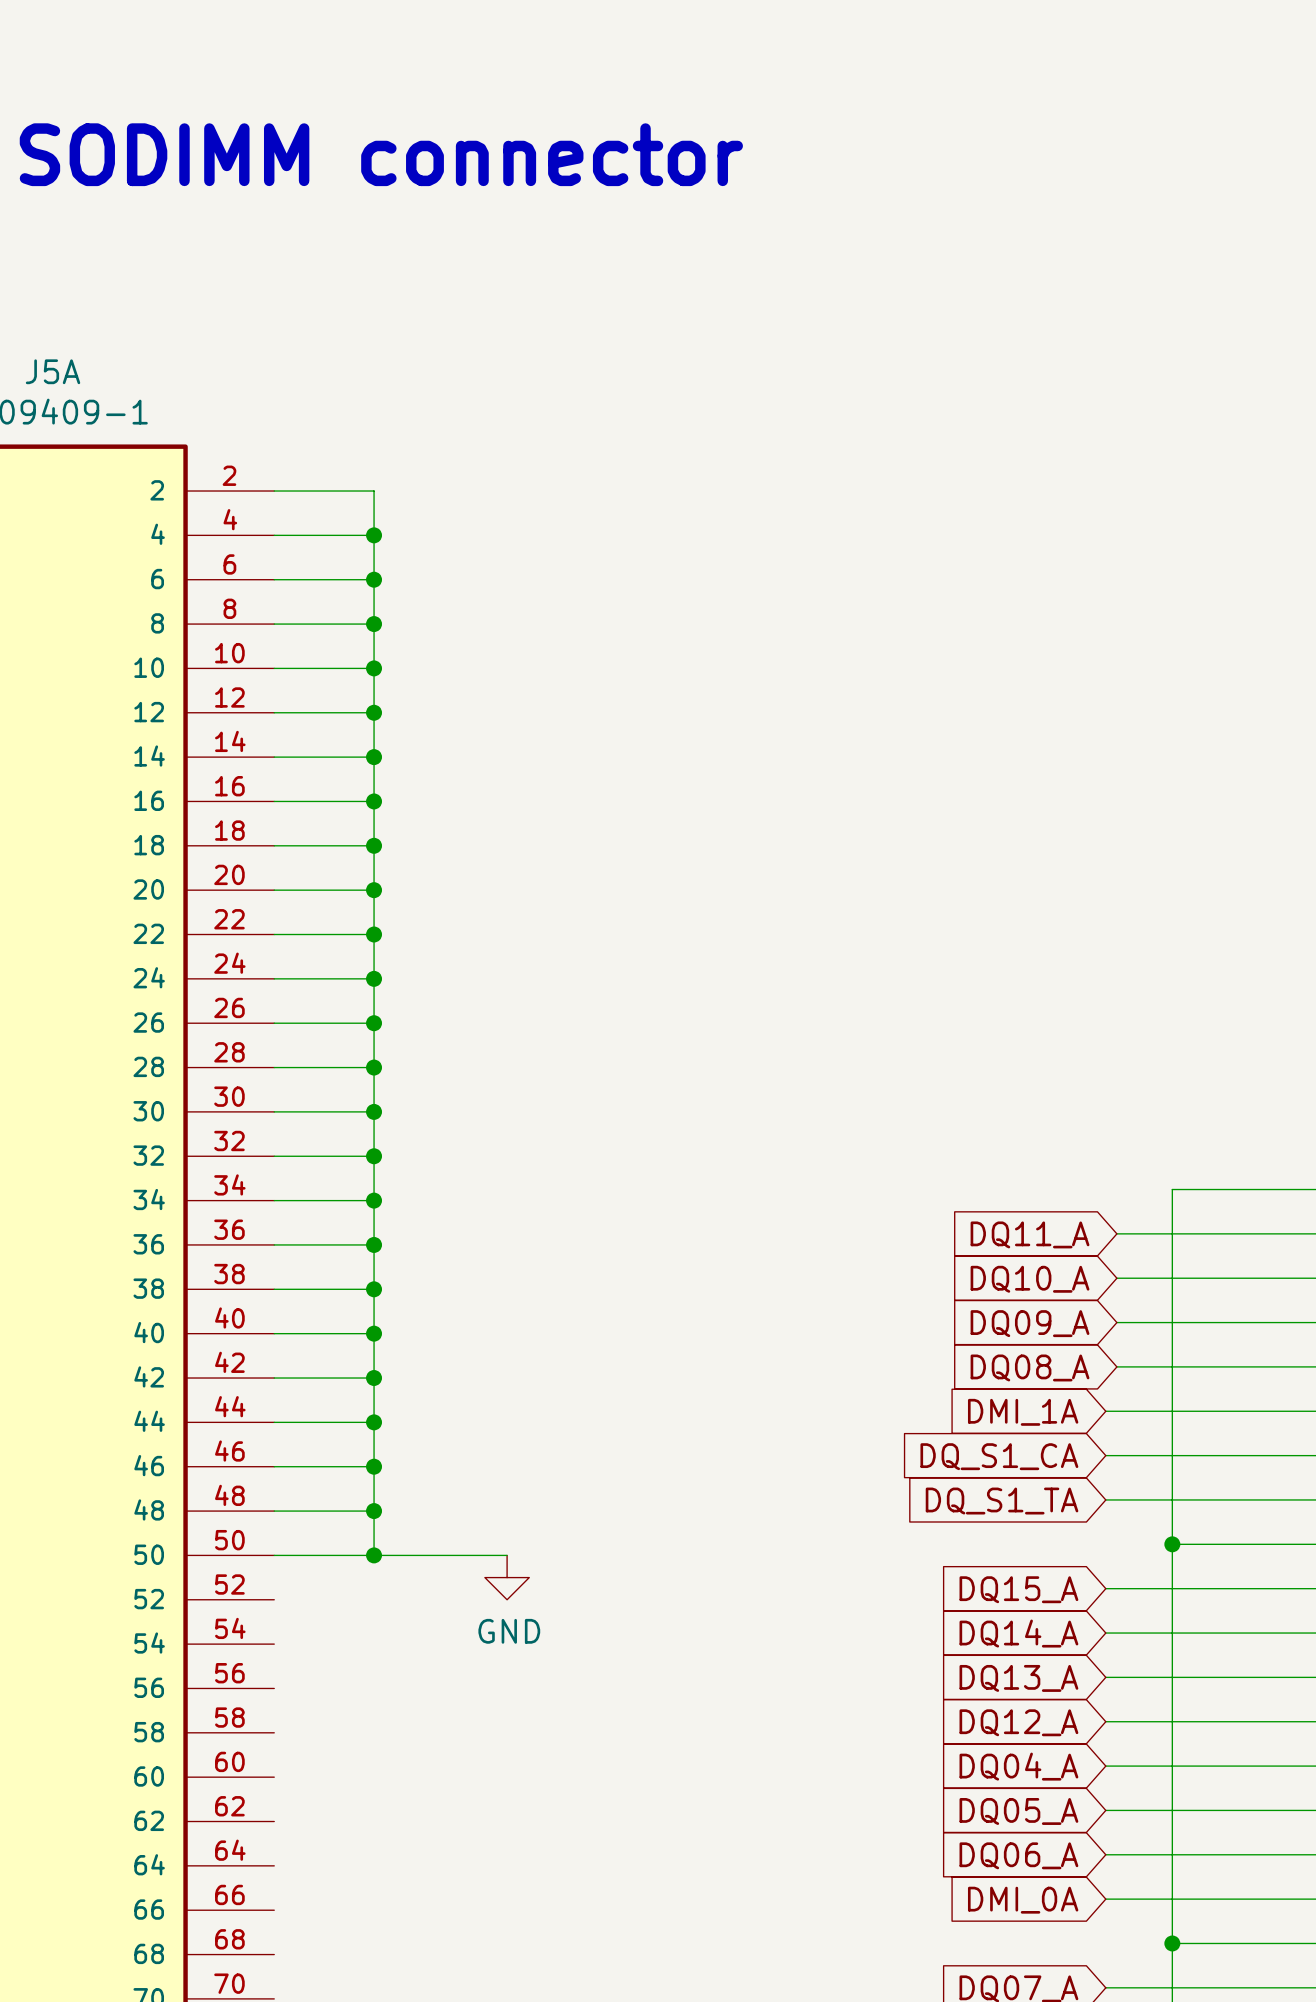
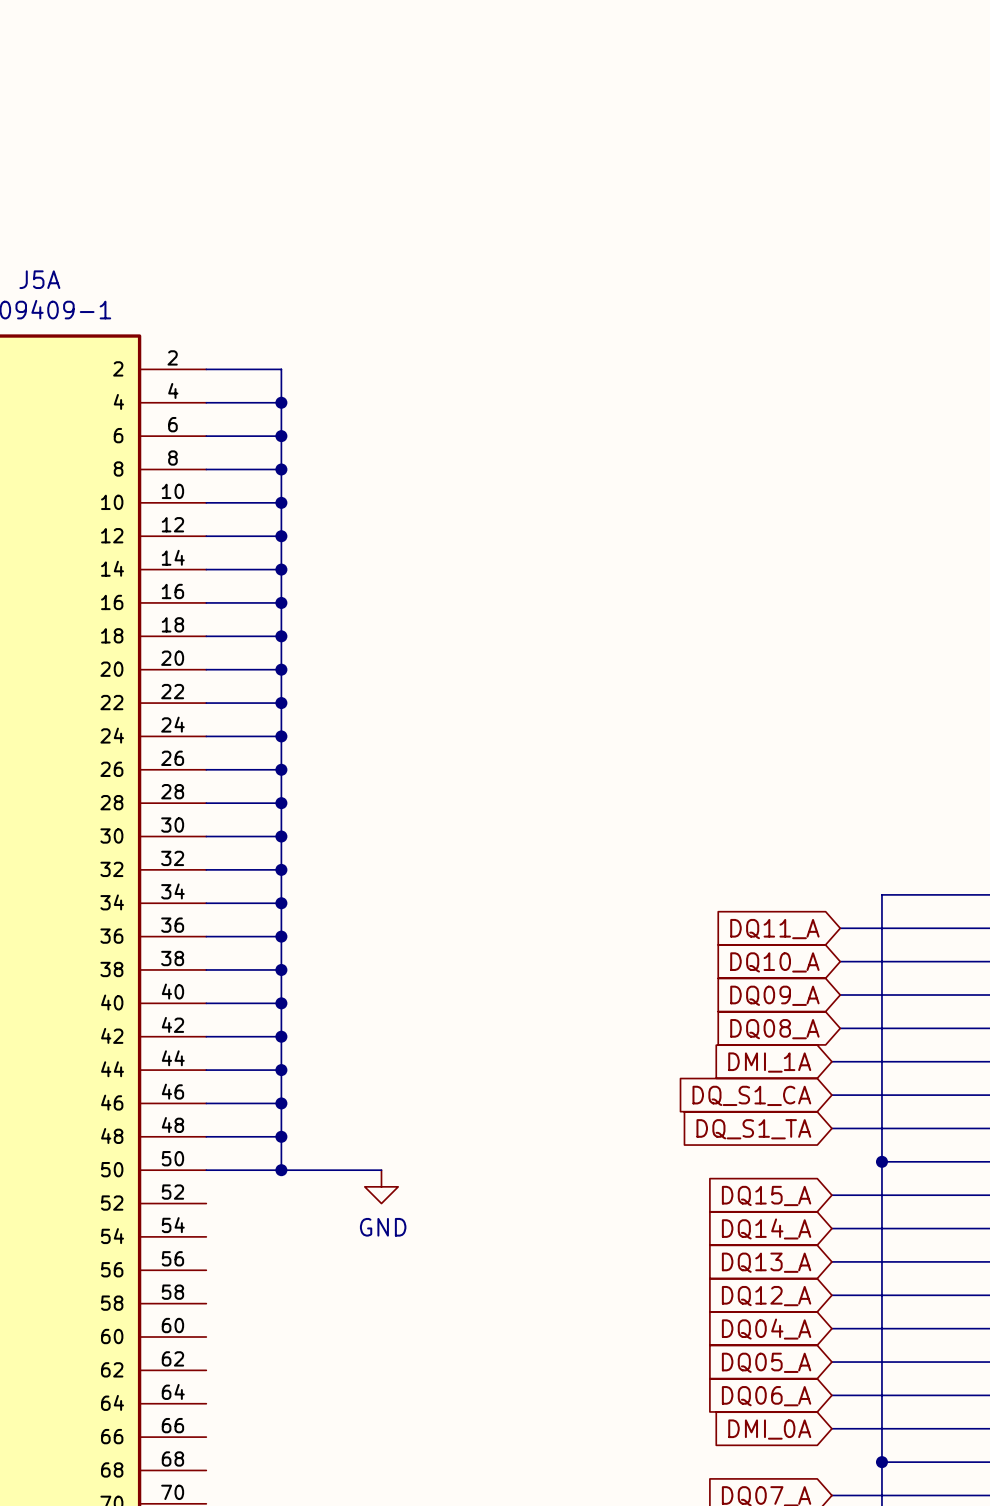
text: SODIMM connector (381, 154) -> none

